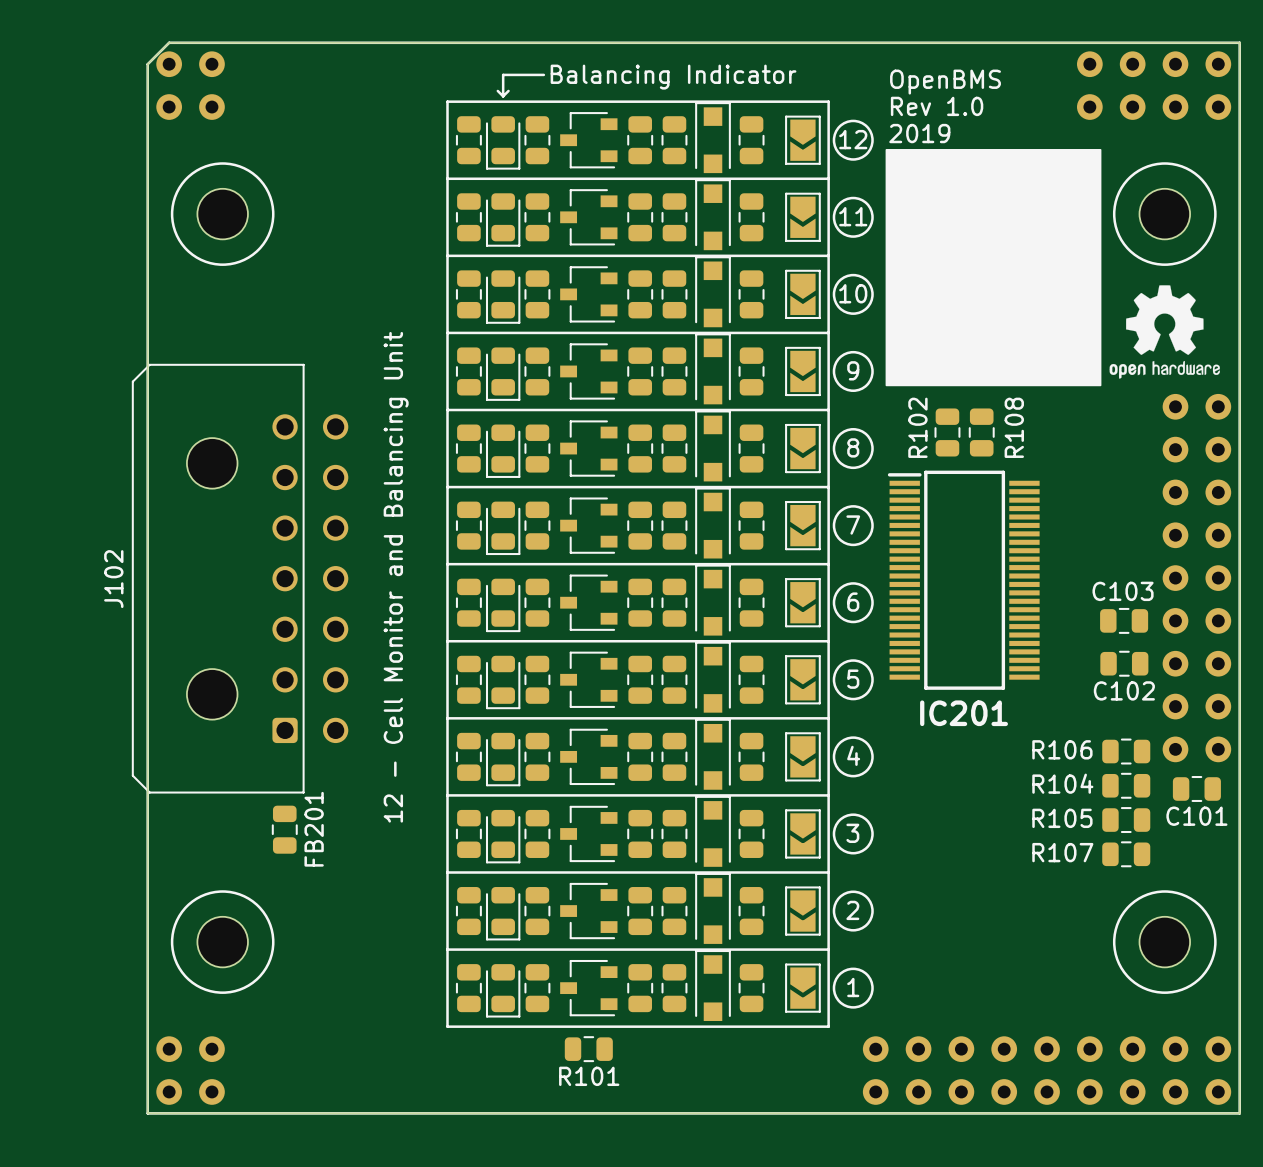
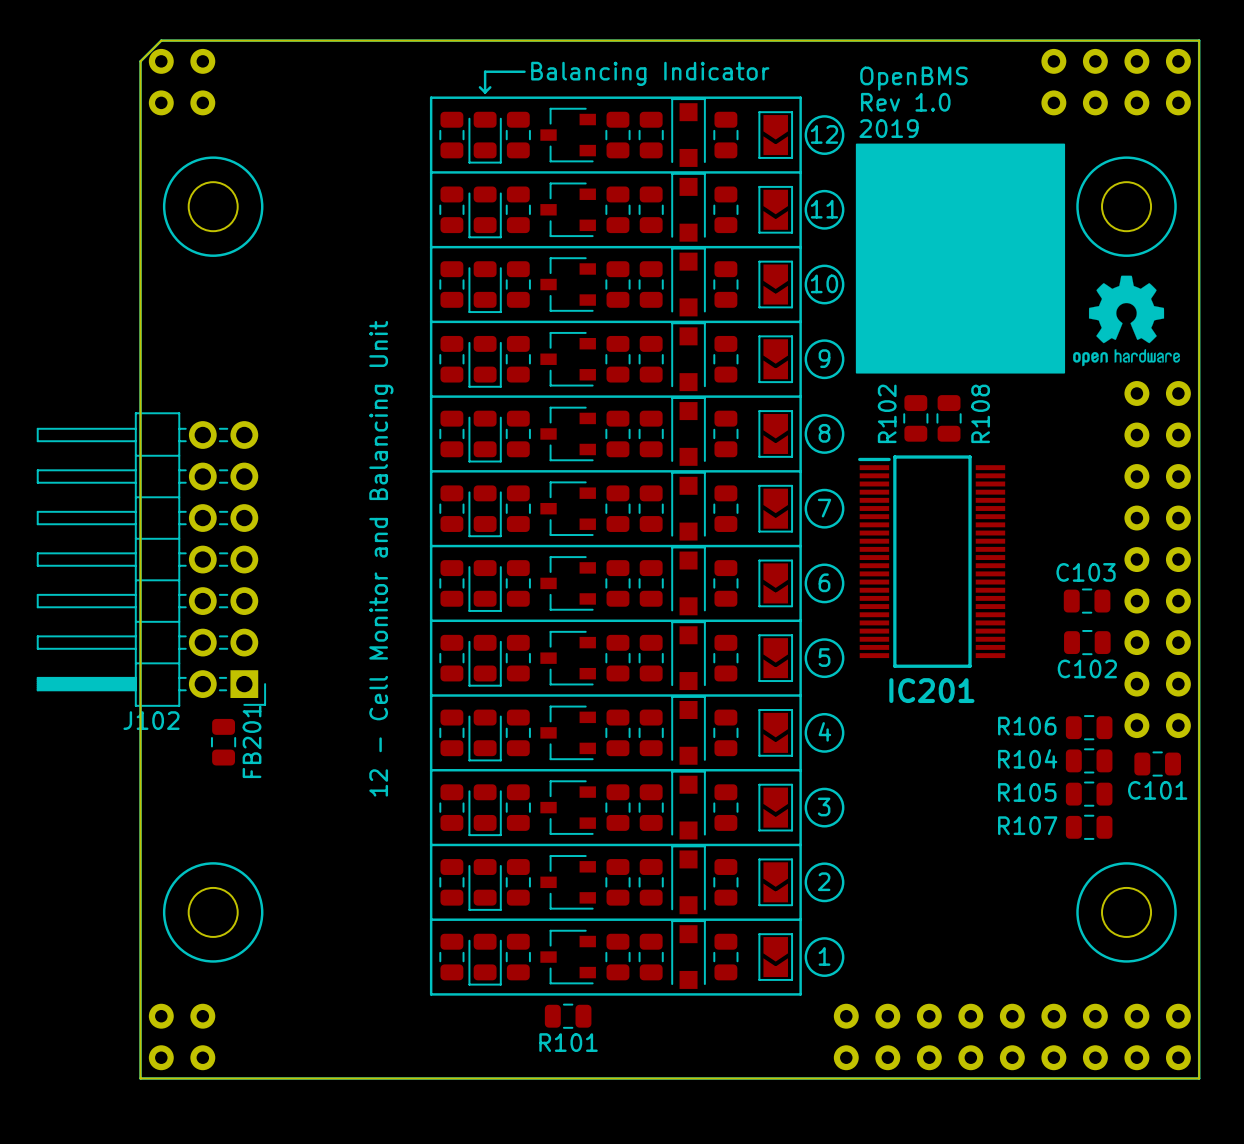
J102 footprint: [131, 363, 349, 794] -> [36, 412, 267, 707]
J102 name position: J102 (113, 579) -> J102 (151, 720)
FB201 position: (284, 829) -> (223, 742)

